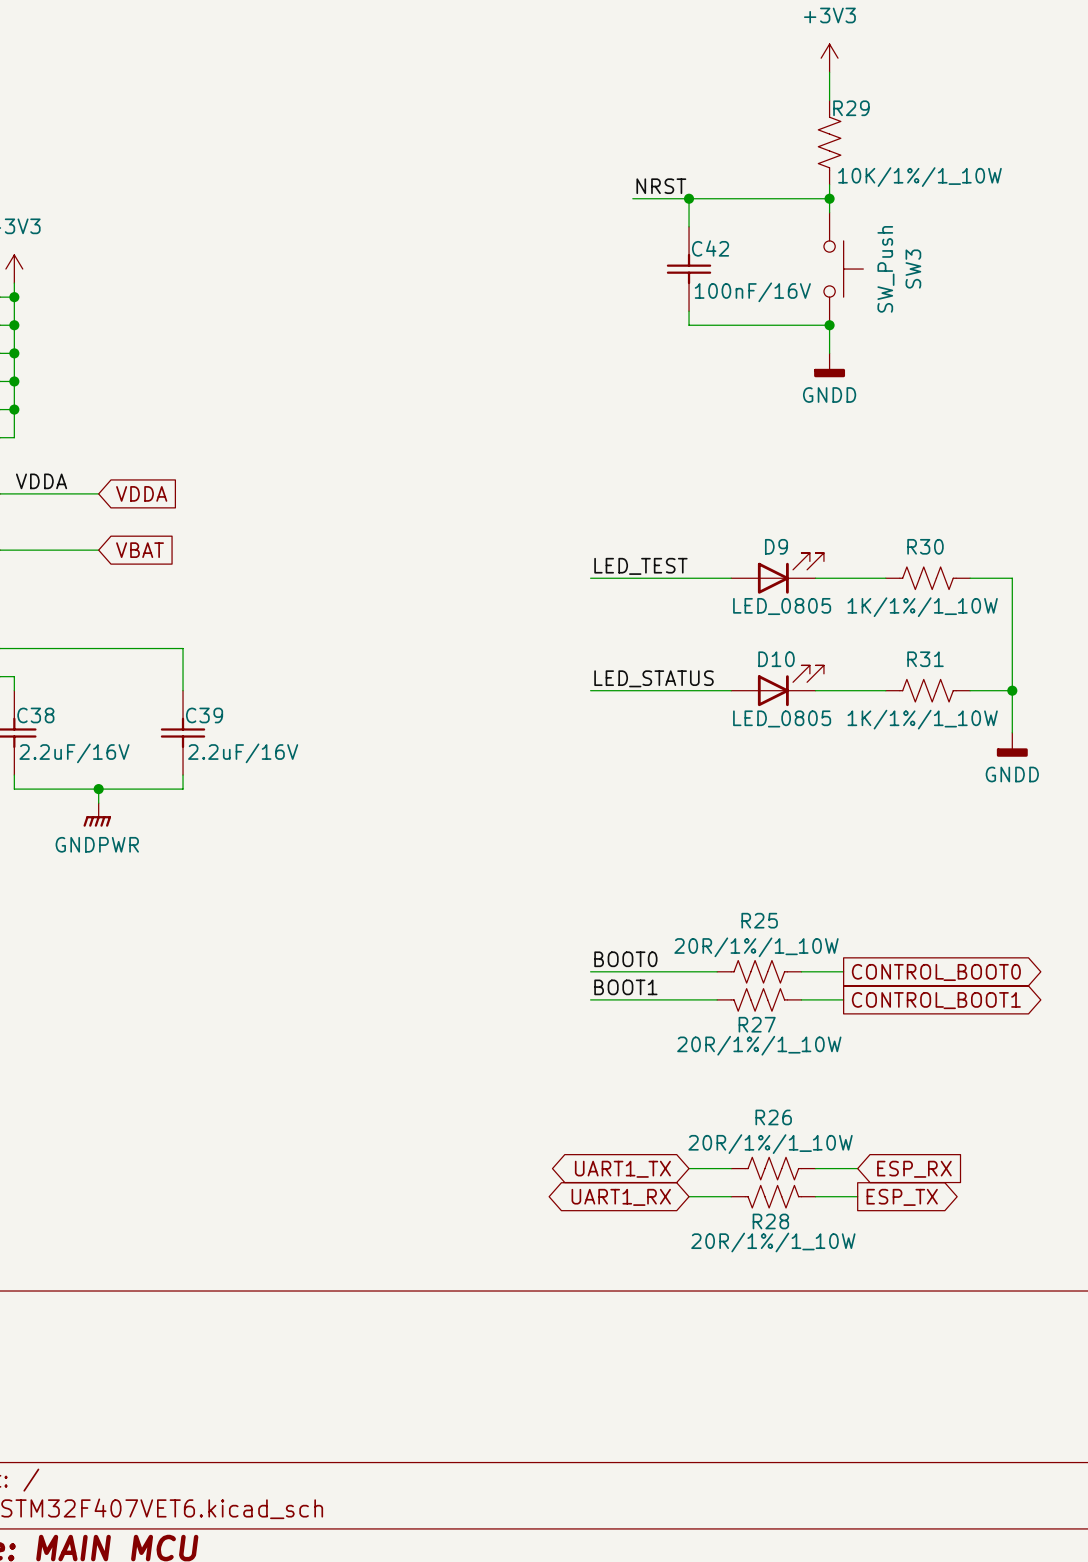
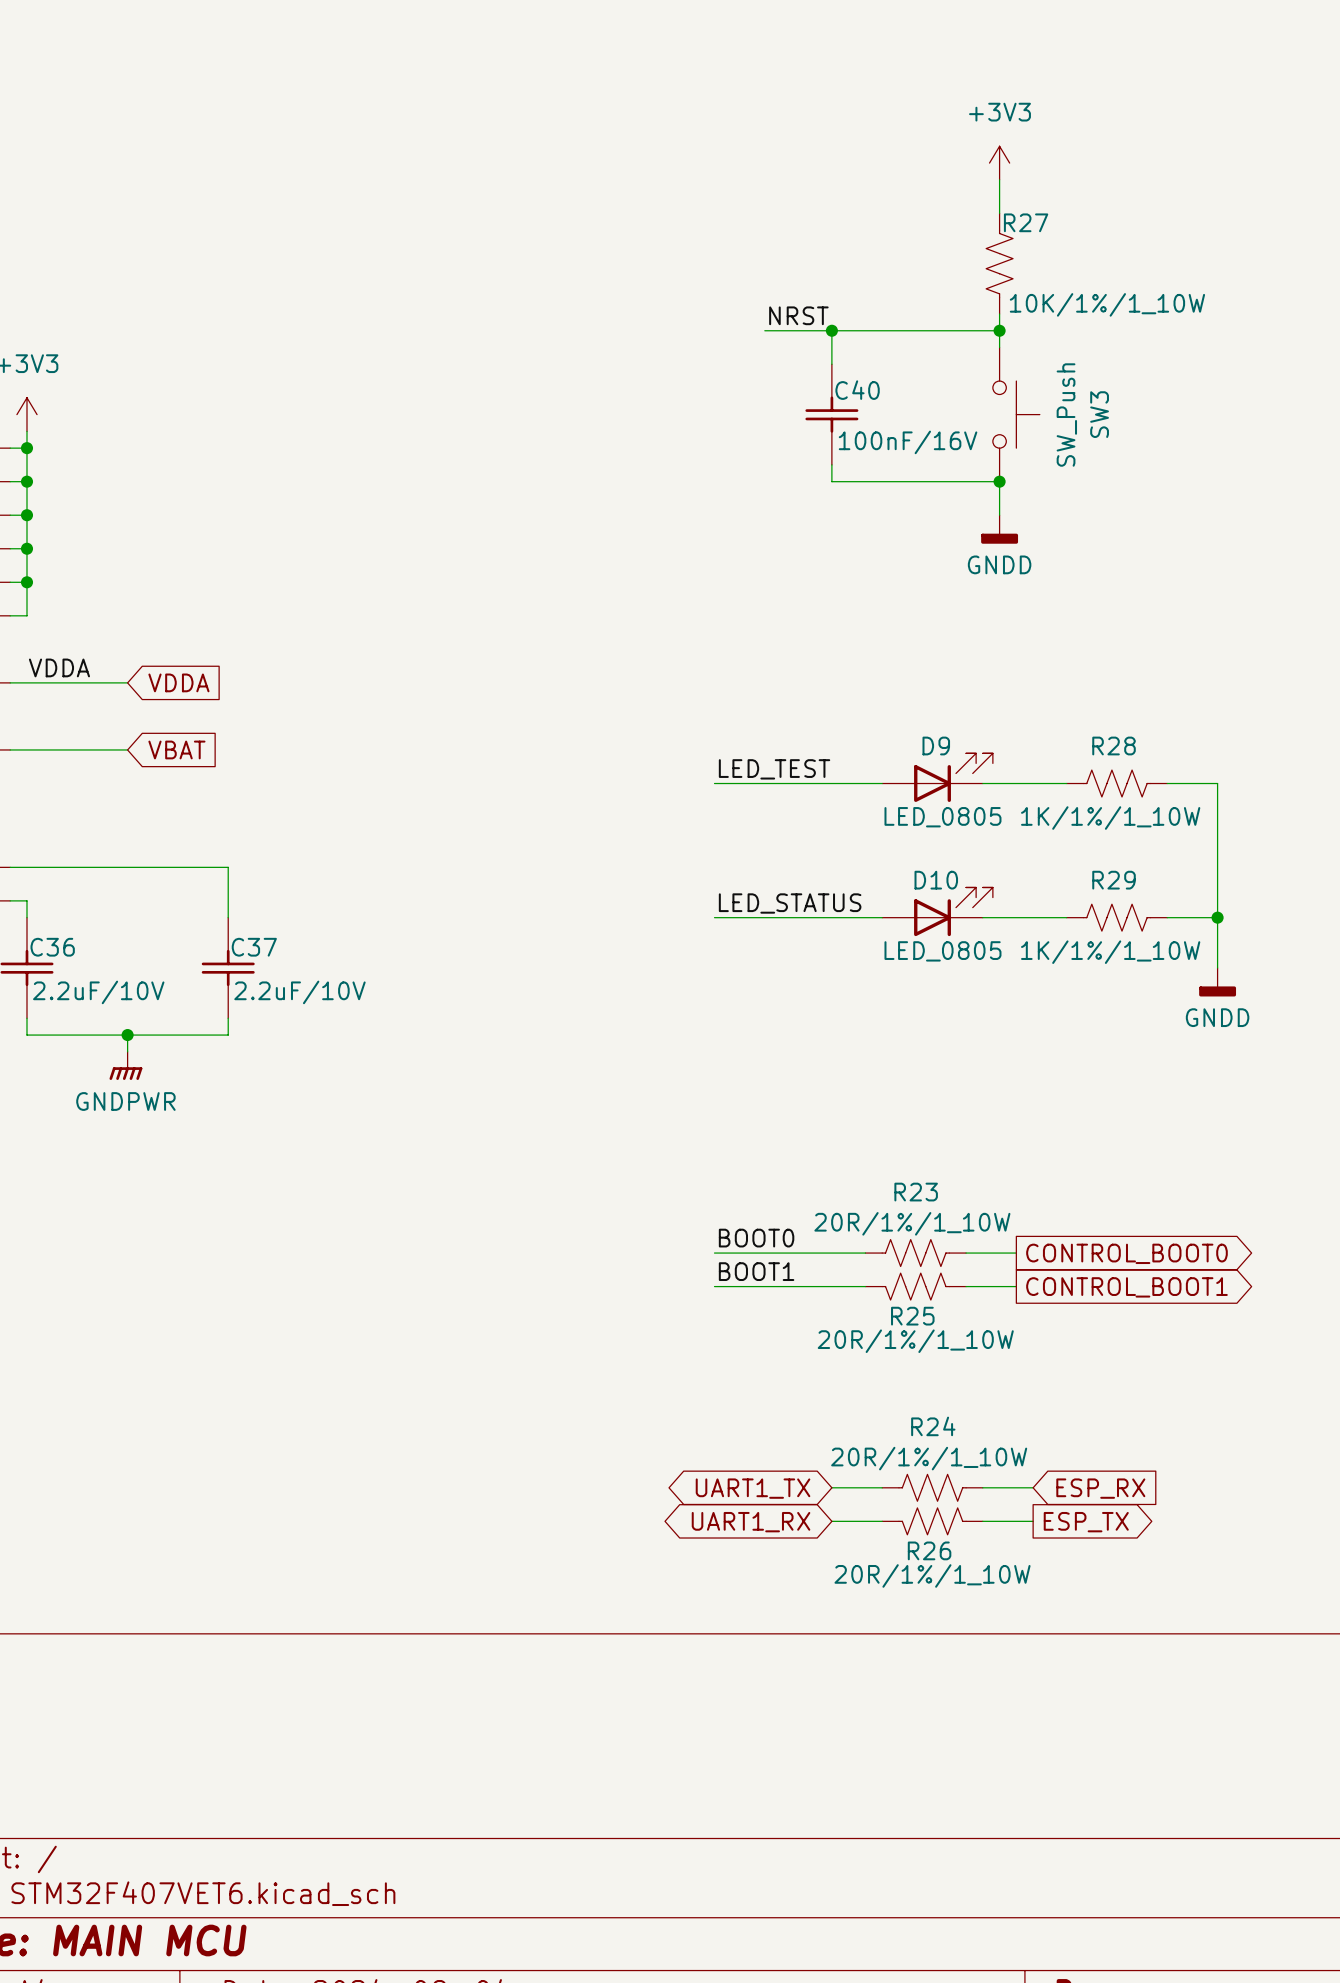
R29 name: R29 (851, 108) -> R27 (1026, 222)
C42 name: C42 (710, 248) -> C40 (857, 390)
R30 name: R30 (925, 546) -> R28 (1114, 746)
R31 name: R31 (925, 659) -> R29 (1114, 880)
C38 name: C38 (35, 715) -> C36 (52, 947)
C39 name: C39 (204, 715) -> C37 (254, 947)
C38 value: 2.2uF/16V (74, 753) -> 2.2uF/10V (98, 992)
C39 value: 2.2uF/16V (243, 753) -> 2.2uF/10V (299, 992)
R25 name: R25 (759, 920) -> R23 (916, 1192)
R27 name: R27 (757, 1024) -> R25 (912, 1316)
R26 name: R26 (773, 1117) -> R24 (933, 1426)
R28 name: R28 (770, 1221) -> R26 (929, 1550)

